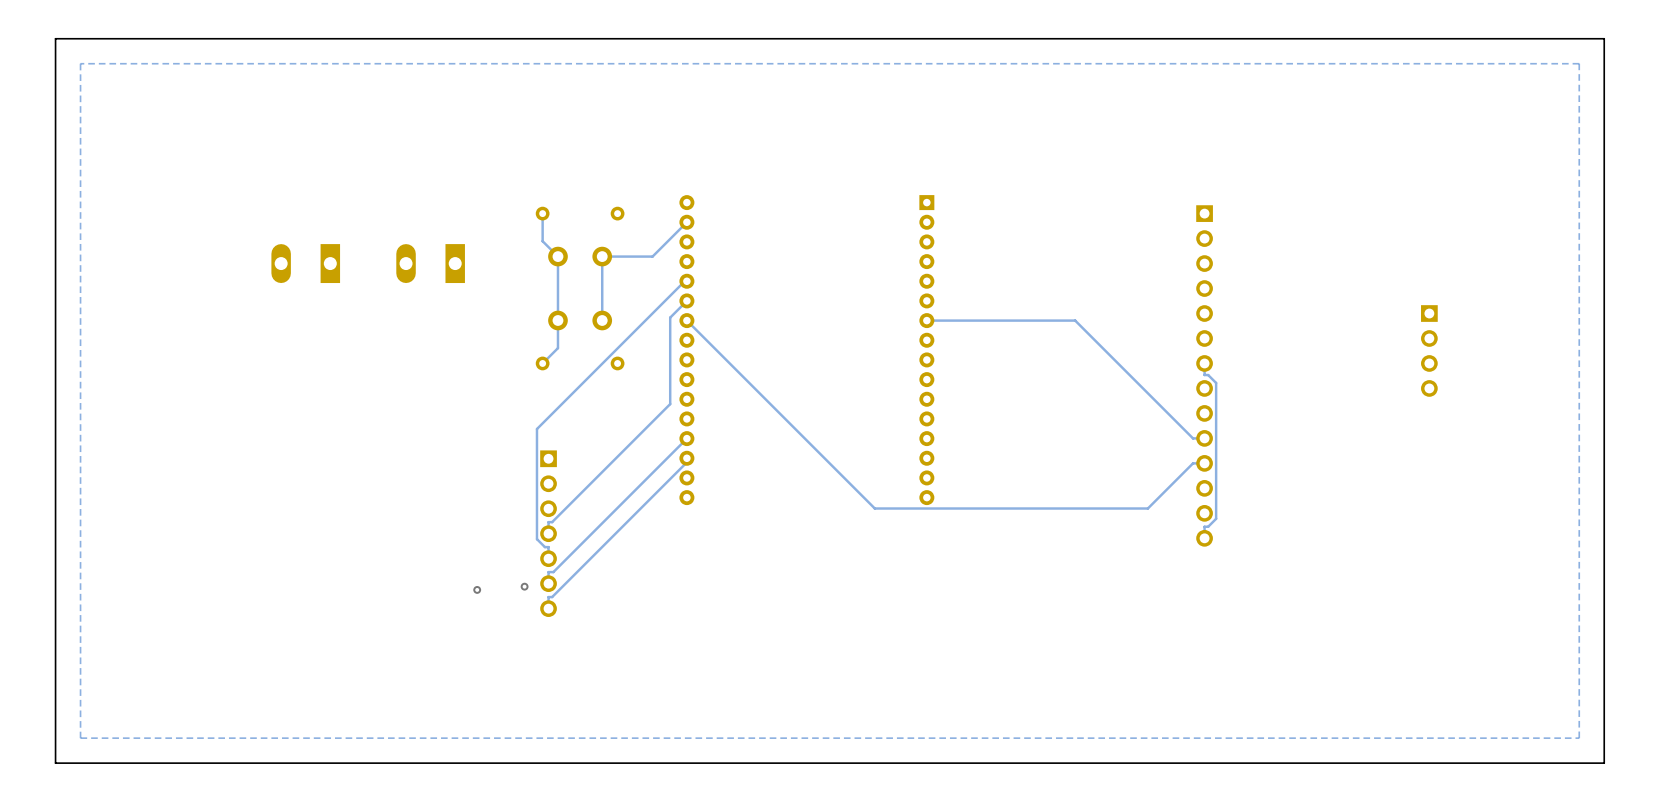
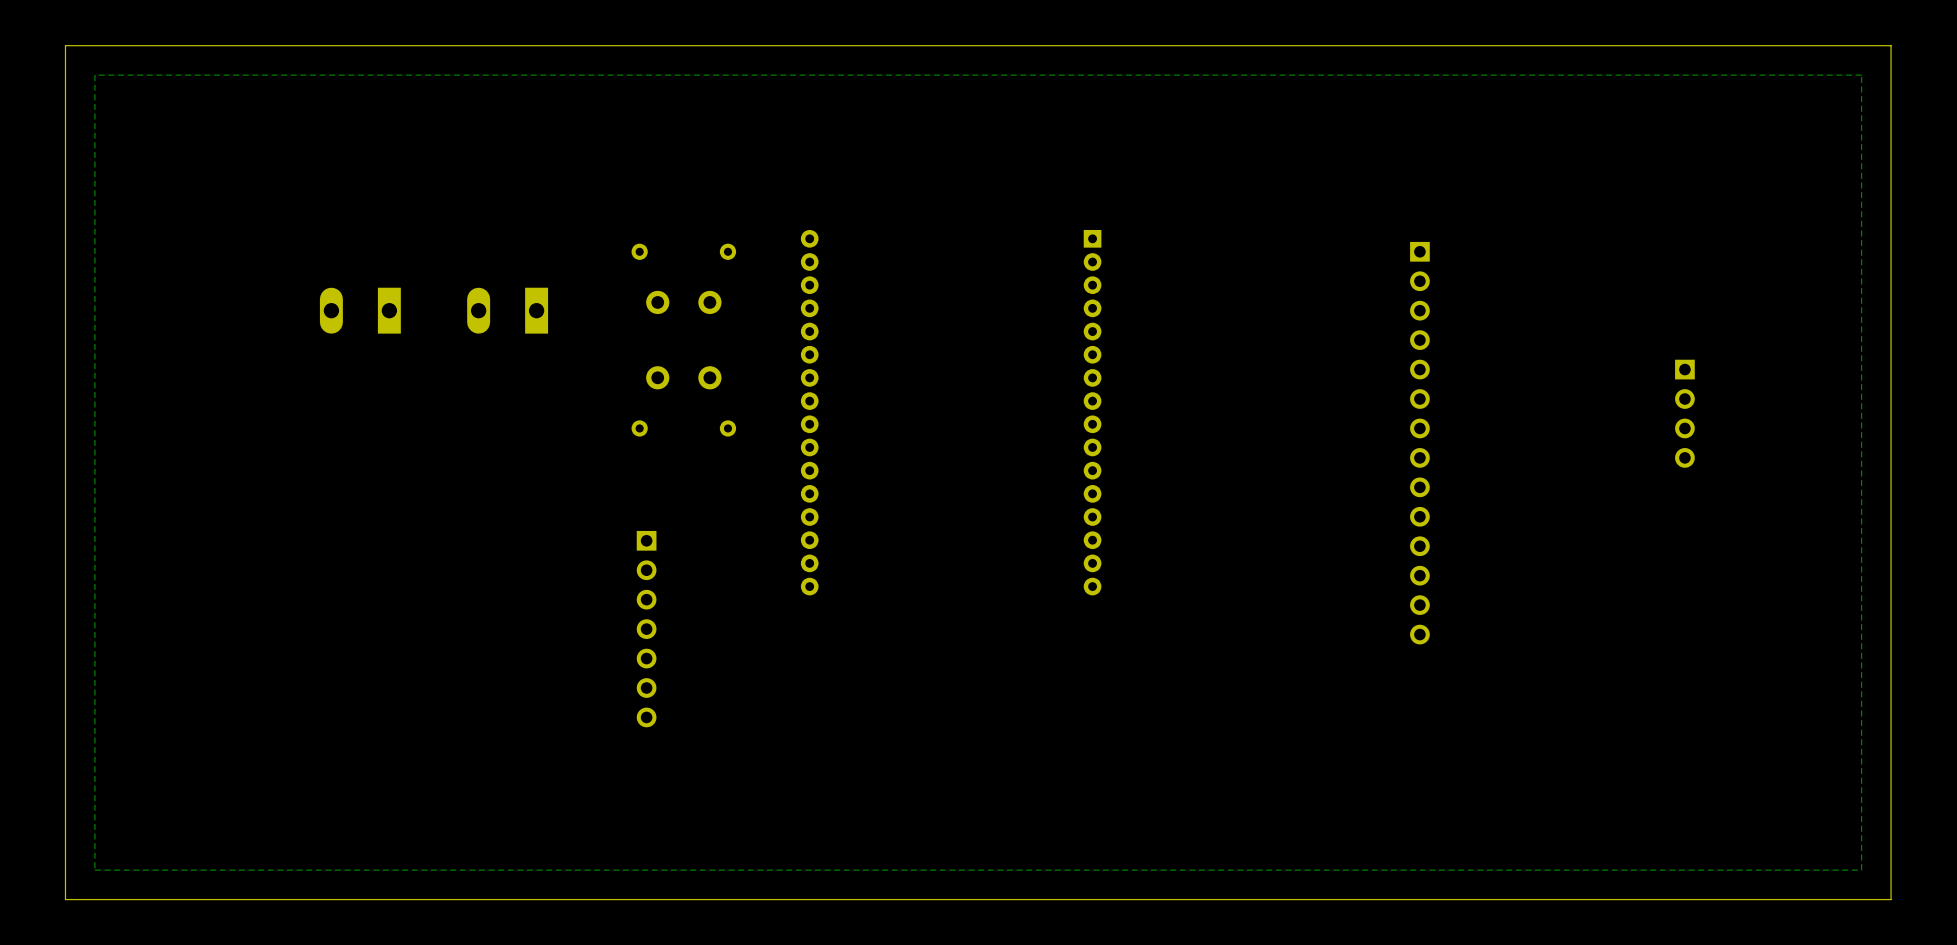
track: (542, 213) (542, 241) (557, 256) (557, 348) (542, 363) -> none
track: (686, 222) (652, 256) (602, 256) (602, 320) -> none
track: (686, 281) (684, 281) (536, 429) (536, 539) (544, 547) (548, 547) (548, 558) -> none
track: (686, 300) (670, 317) (670, 404) (552, 522) (548, 522) (548, 533) -> none
track: (686, 320) (874, 508) (1147, 508) (1193, 463) (1204, 463) -> none
track: (926, 320) (1075, 320) (1193, 438) (1204, 438) -> none
track: (1204, 363) (1204, 375) (1208, 375) (1216, 382) (1216, 518) (1208, 526) (1204, 526) (1204, 538) -> none
track: (686, 438) (553, 572) (548, 572) (548, 583) -> none
track: (686, 458) (686, 462) (552, 597) (548, 597) (548, 608) -> none
via: (524, 586) -> none
via: (477, 589) -> none

